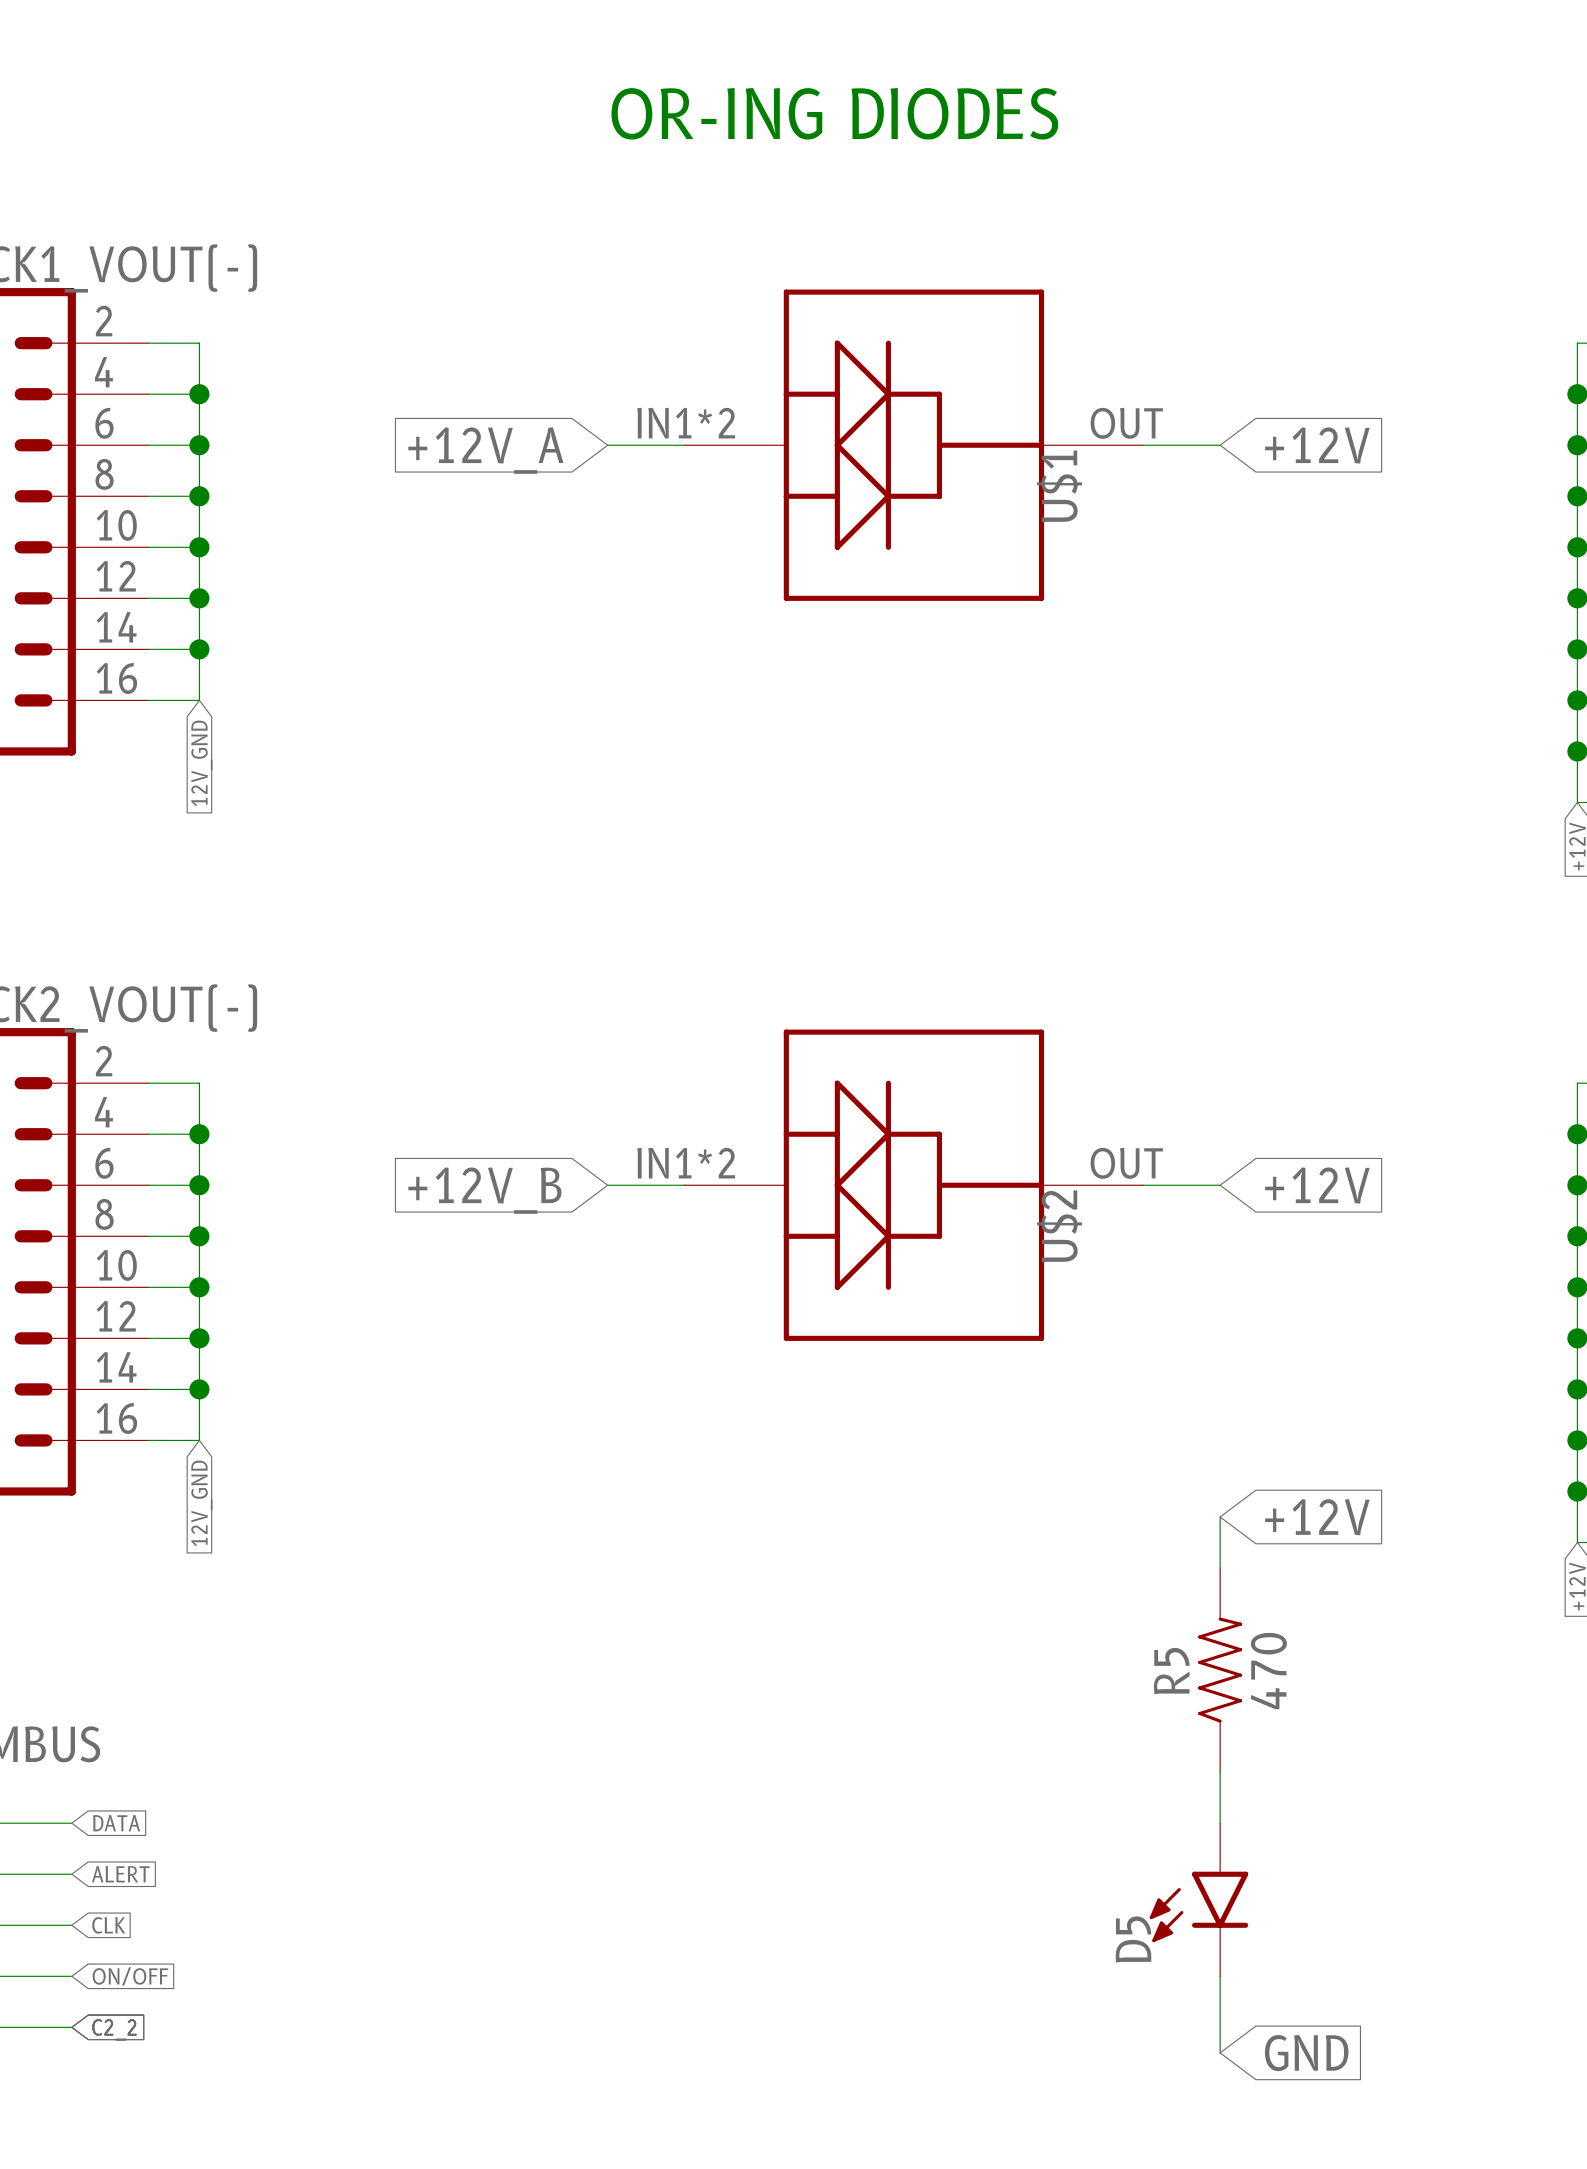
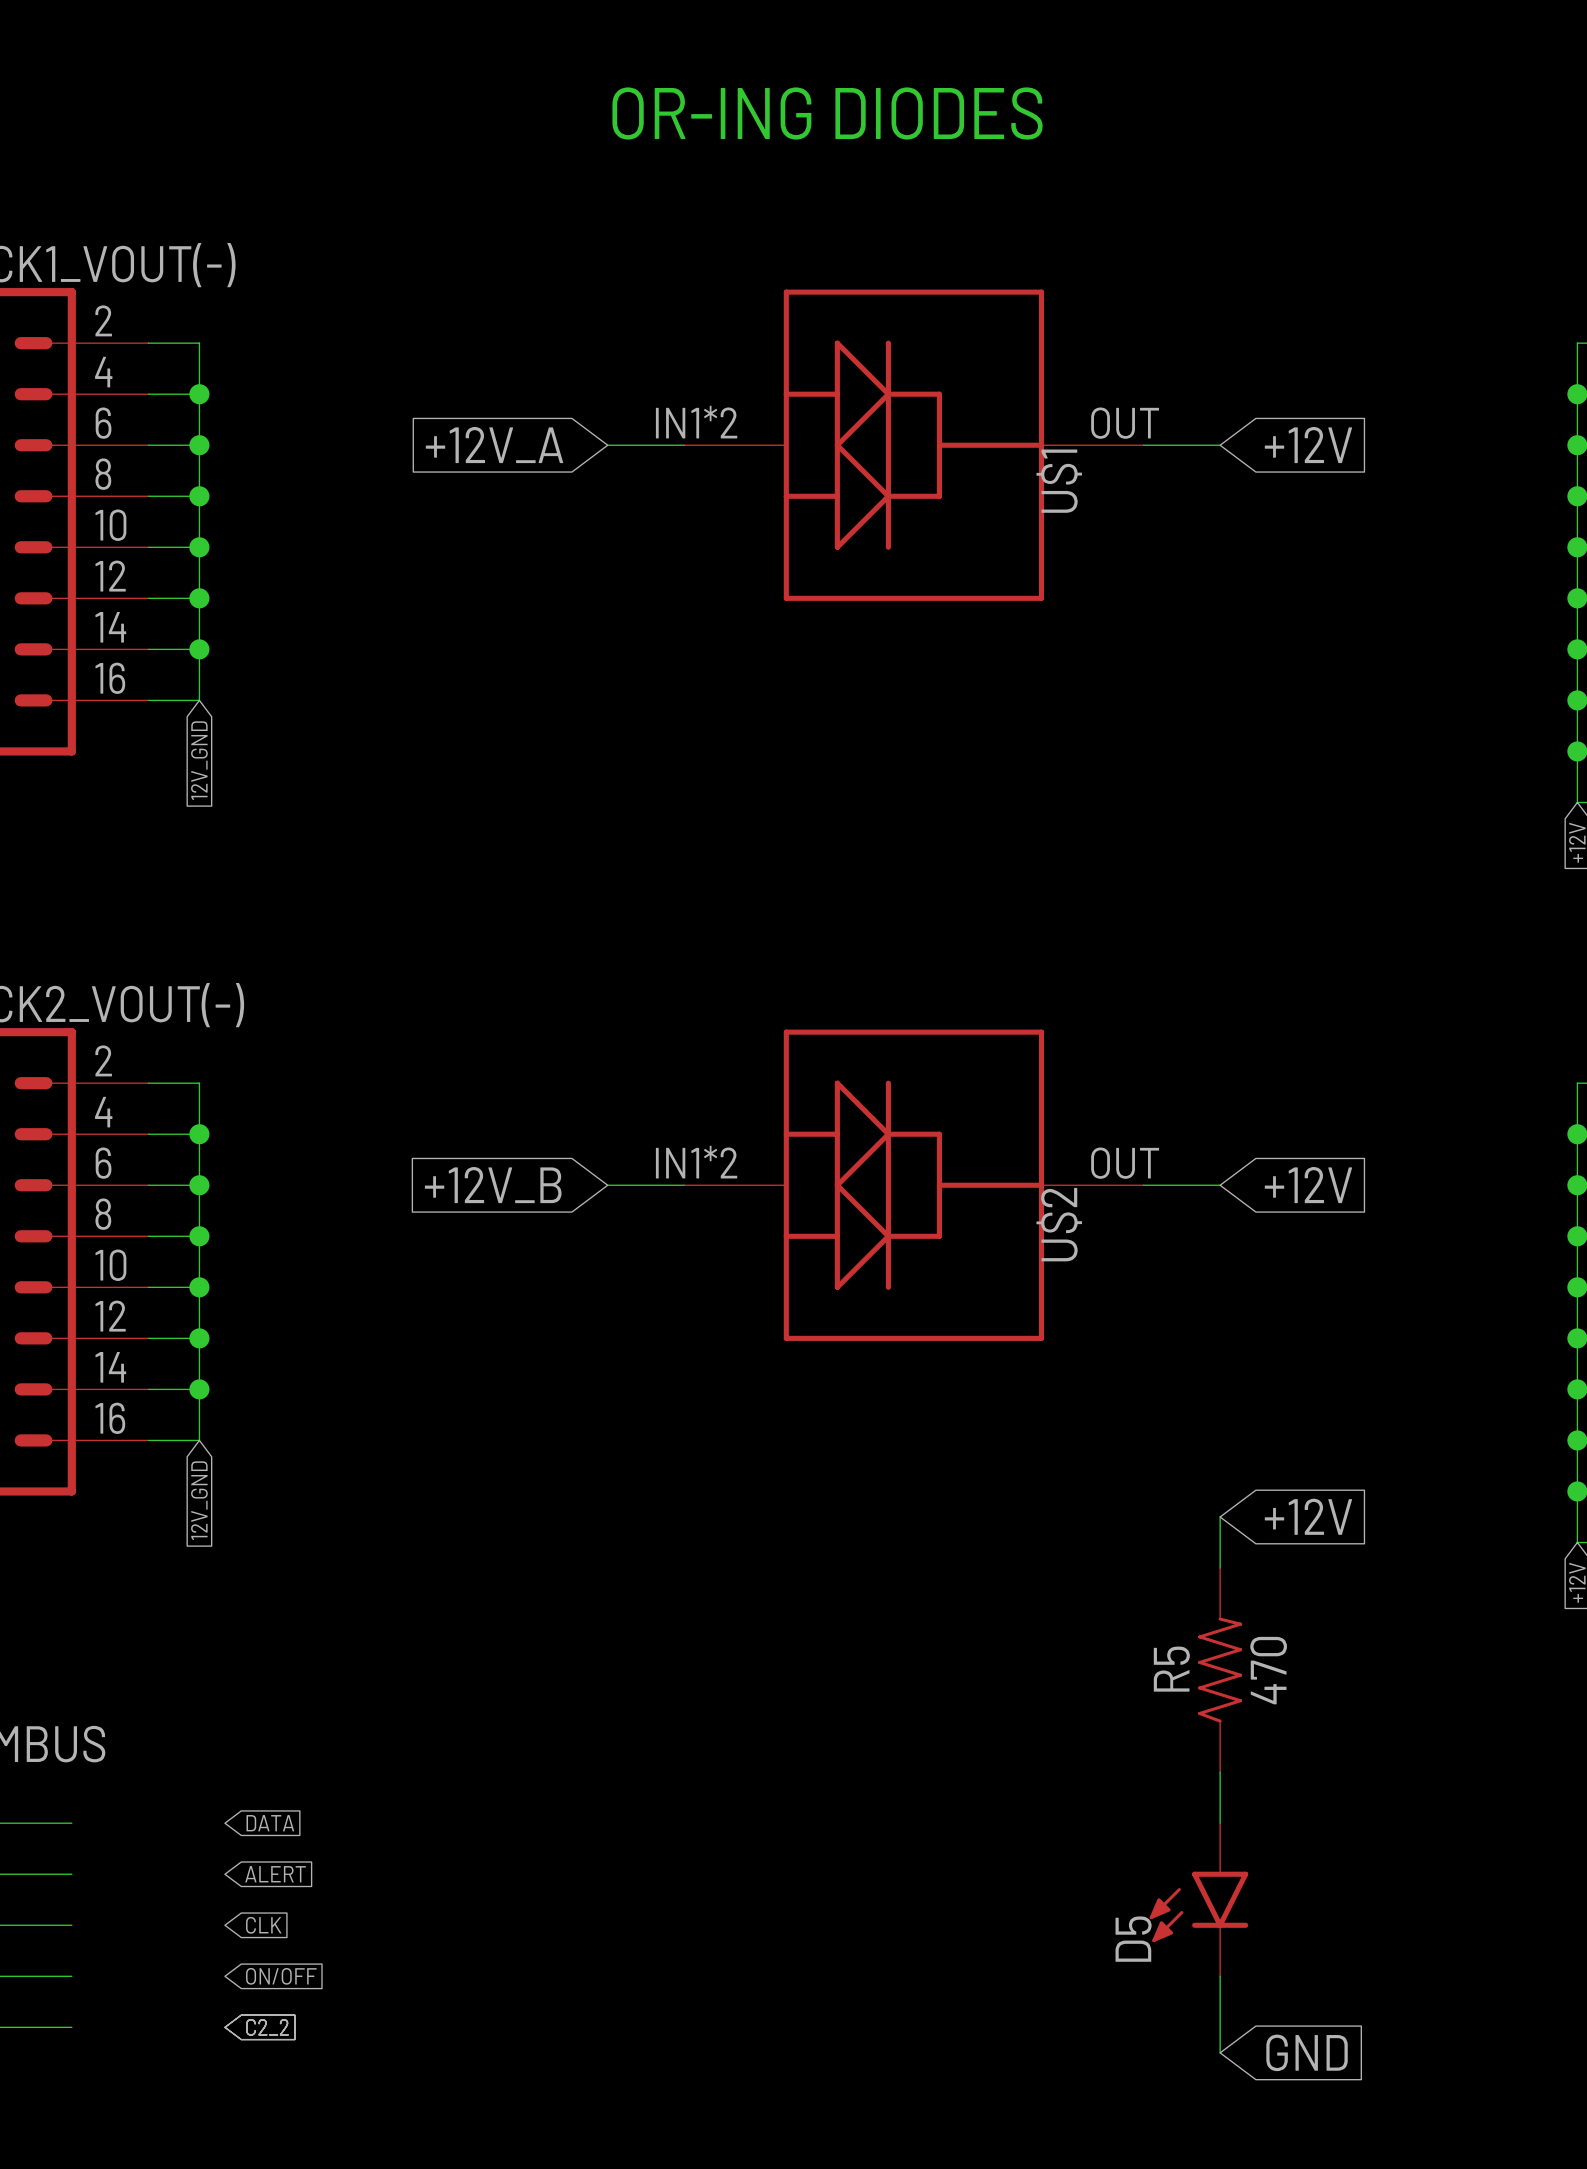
global label position: DATA (116, 1823) -> DATA (270, 1823)
global label position: ALERT (120, 1874) -> ALERT (275, 1874)
global label position: CLK (108, 1925) -> CLK (263, 1925)
global label position: ON/OFF (130, 1976) -> ON/OFF (281, 1976)
global label position: C2_2 (114, 2029) -> C2_2 (267, 2027)

